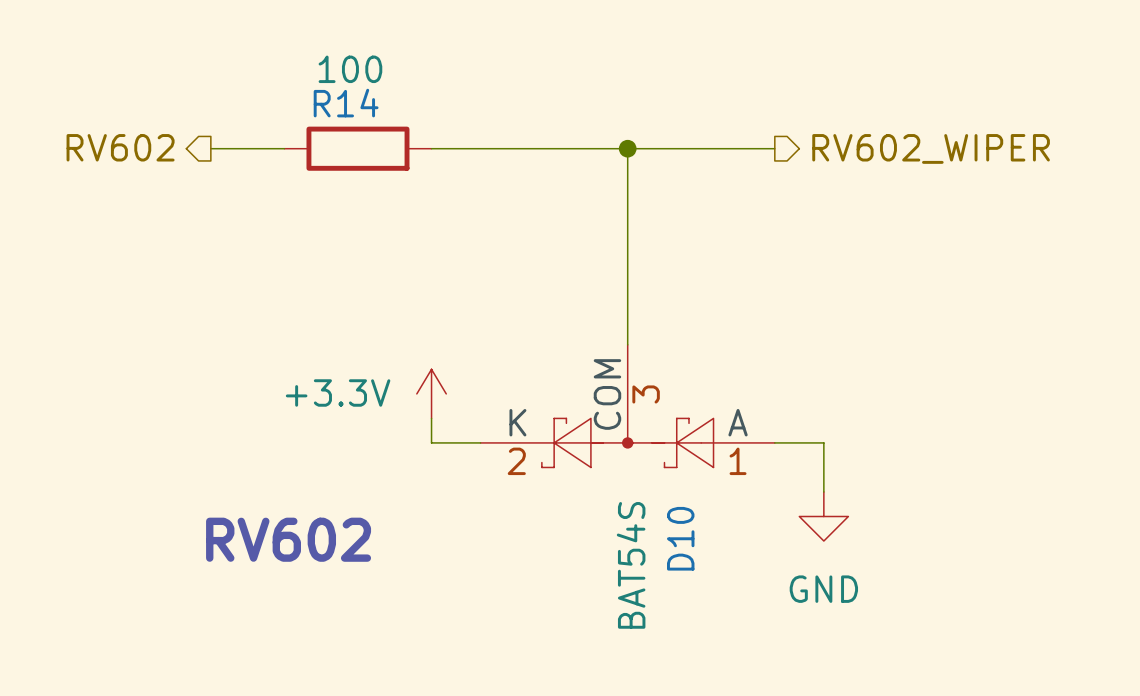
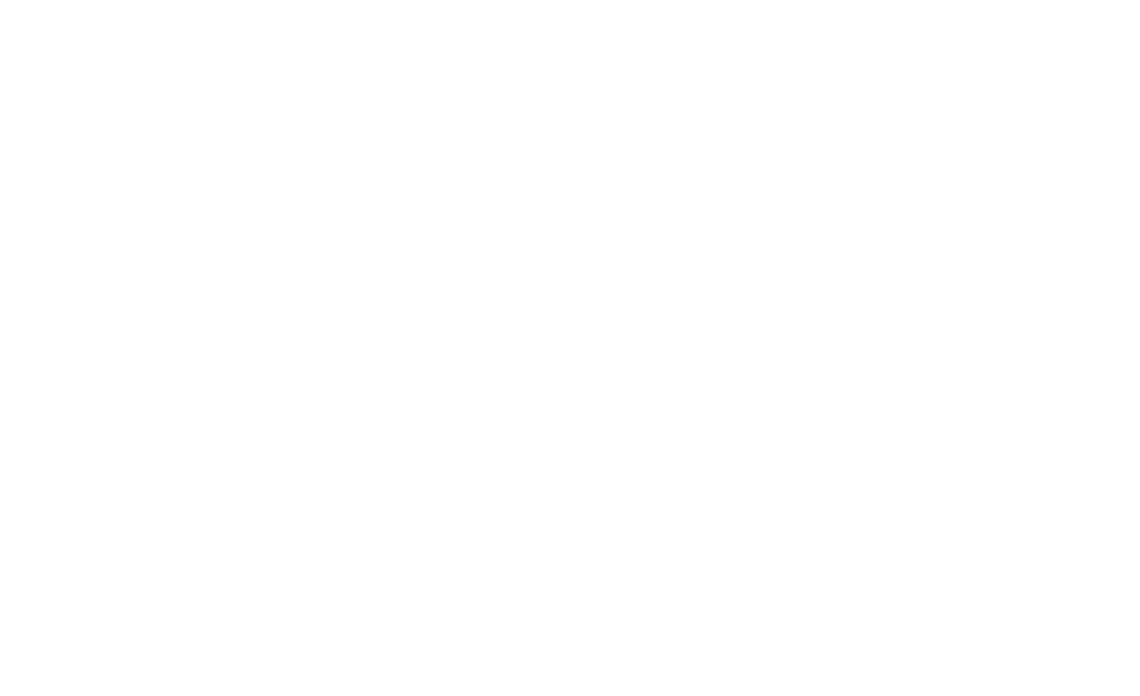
hierarchical label: RV602 (120, 147) -> none
wire: (210, 148) (284, 148) -> none
R14: 100 (357, 148) -> none
wire: (431, 148) (774, 148) -> none
wire: (627, 148) (627, 344) -> none
junction: (627, 148) -> none
hierarchical label: RV602_WIPER (931, 148) -> none
power symbol: +3.3V (431, 393) -> none
D10: BAT54S (627, 406) -> none
wire: (431, 418) (431, 442) (480, 442) -> none
wire: (774, 442) (823, 442) (823, 491) -> none
power symbol: GND (823, 516) -> none
text: RV602 (288, 539) -> none

